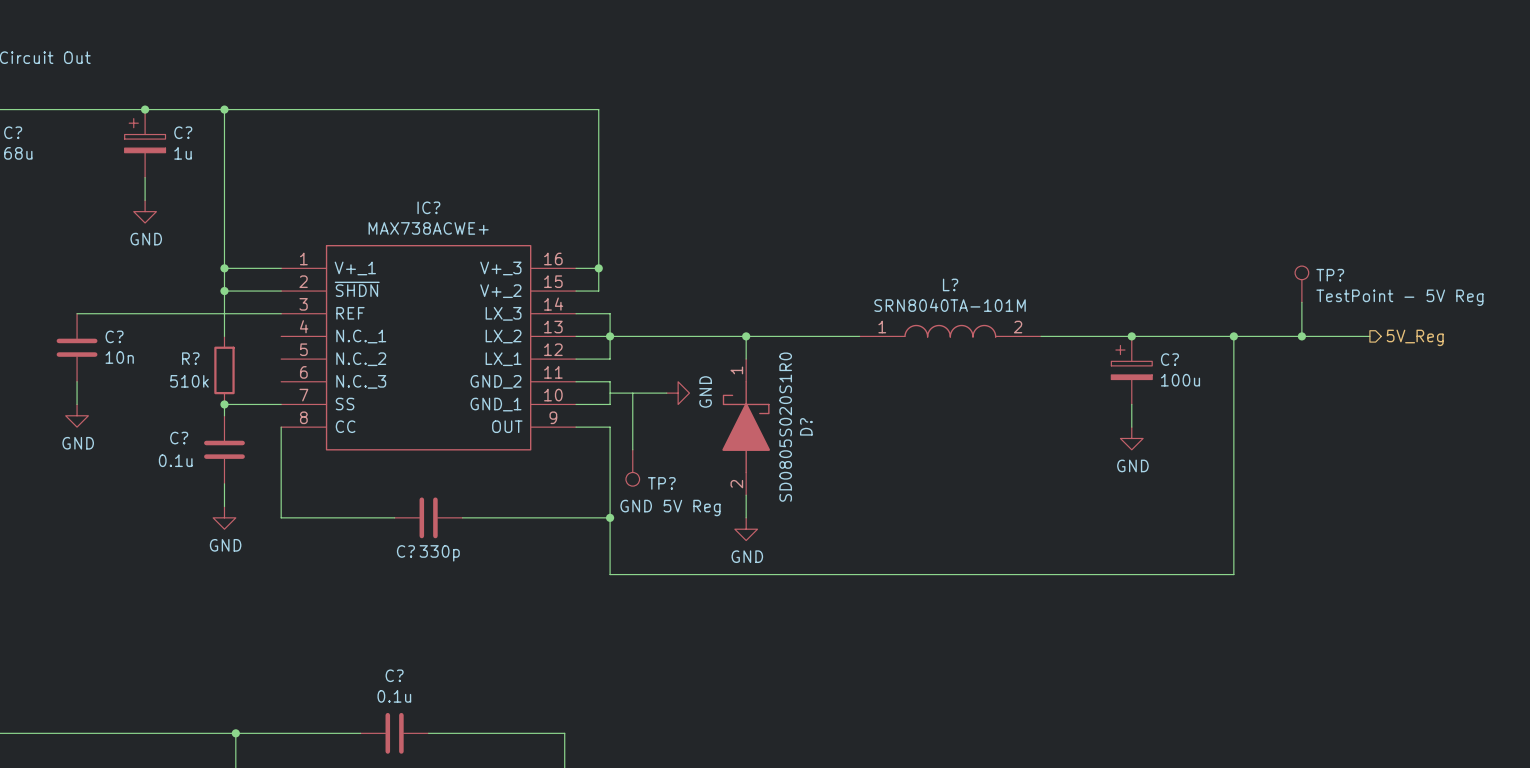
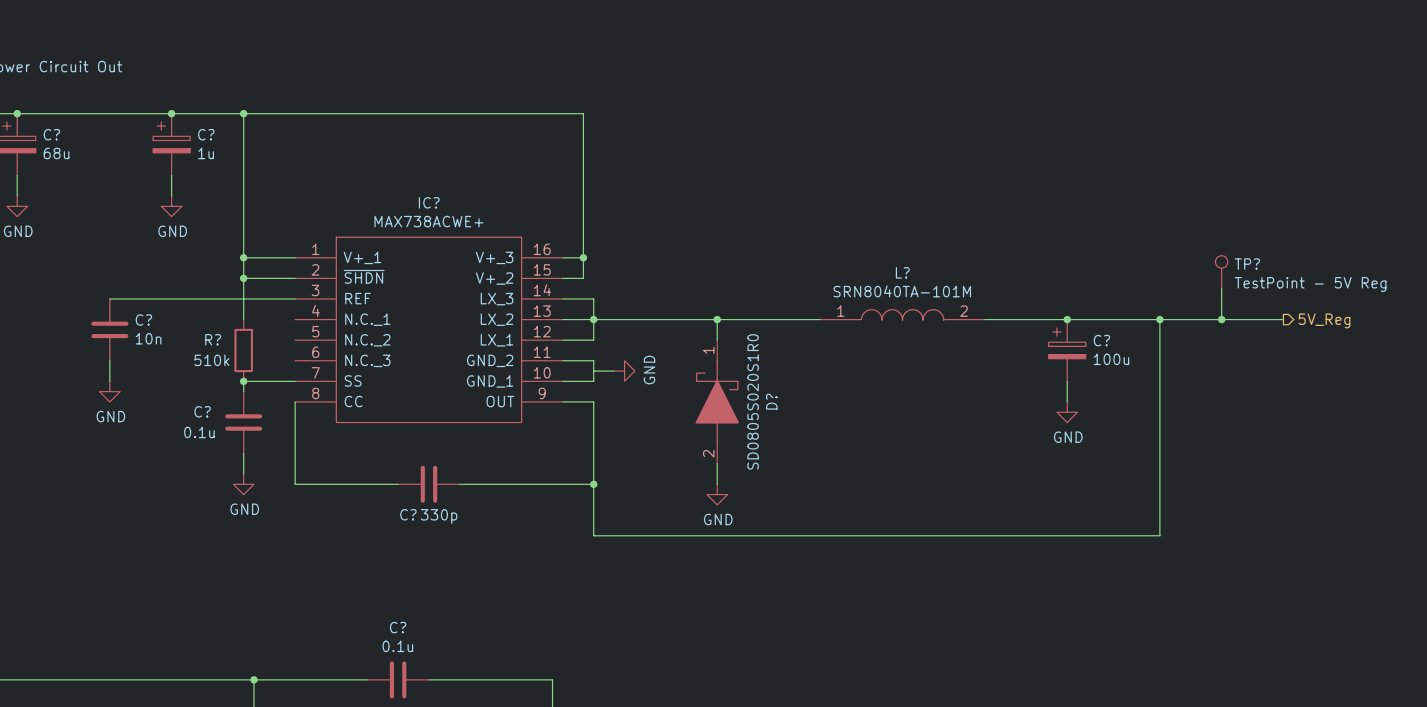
wire: (666, 393) (632, 393) (632, 449) -> none
power symbol position: GND (678, 393) -> GND (624, 371)
TP?: GND 5V Reg (632, 467) -> none

